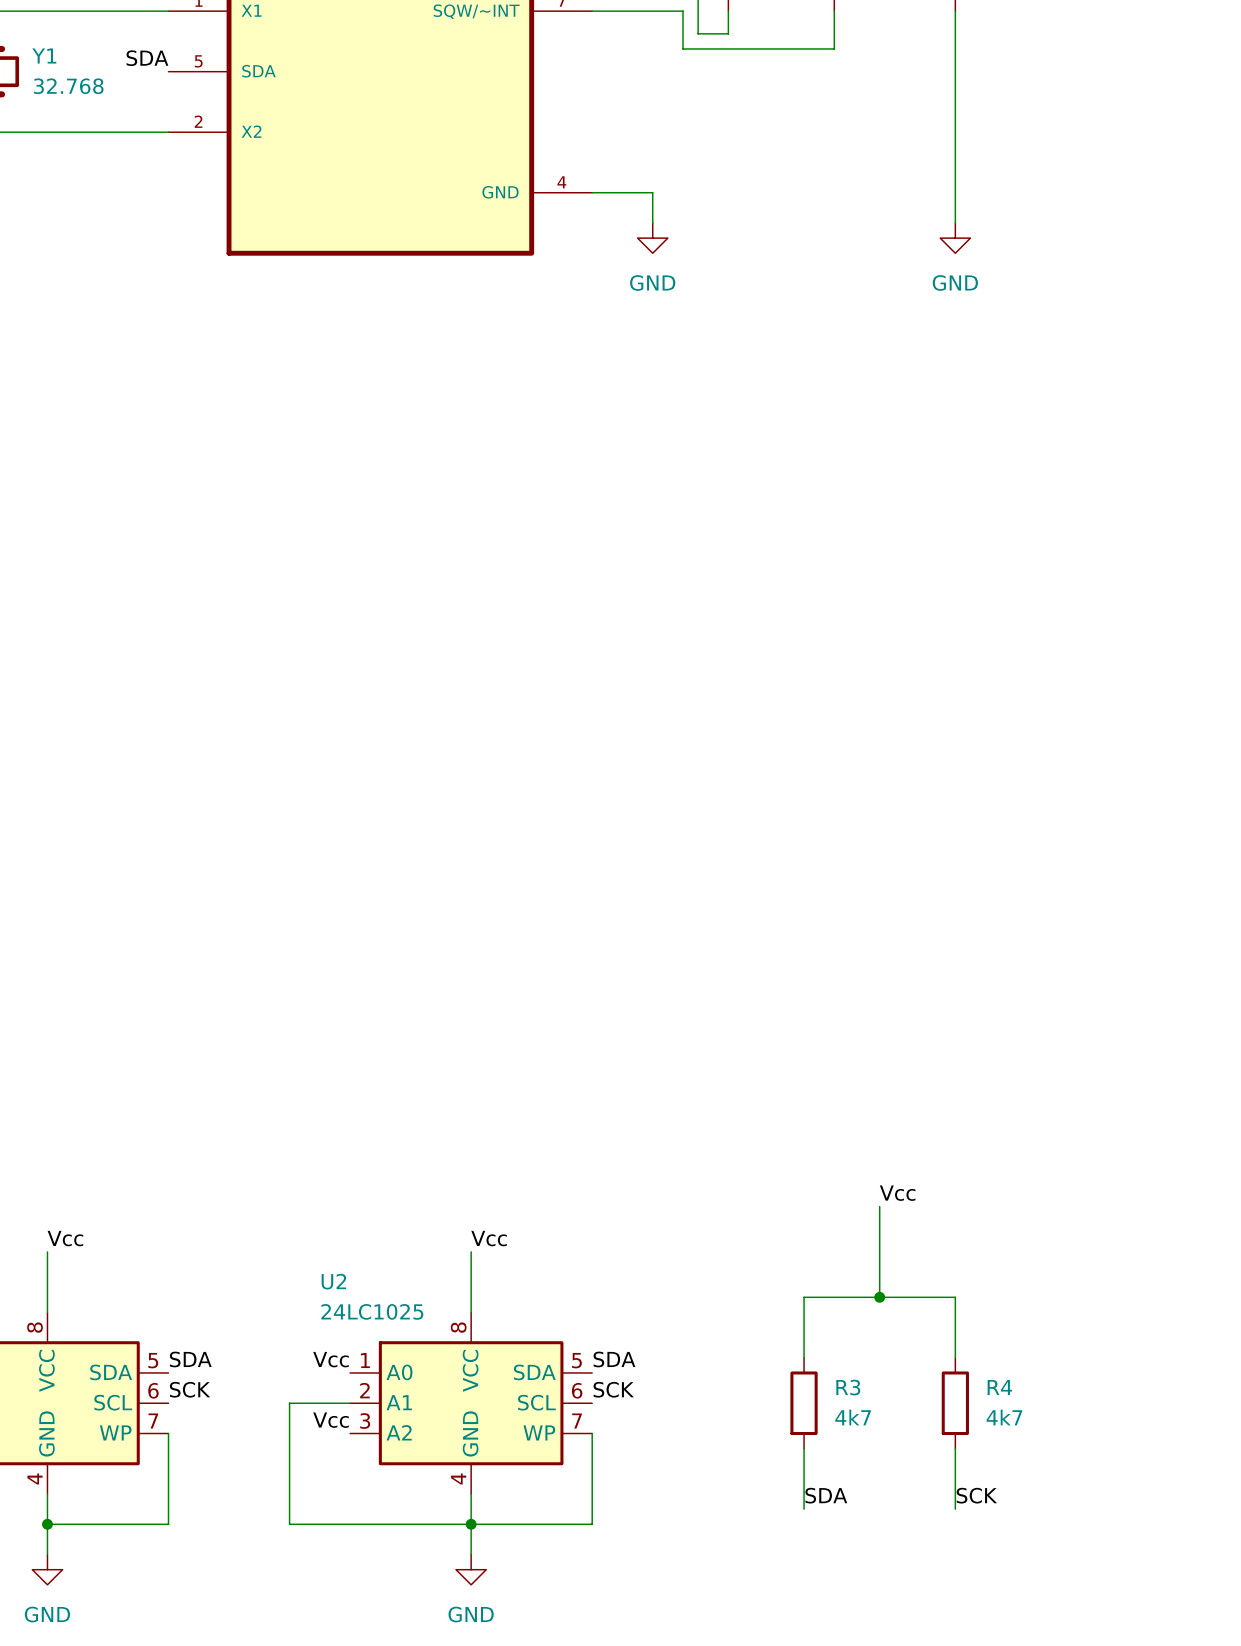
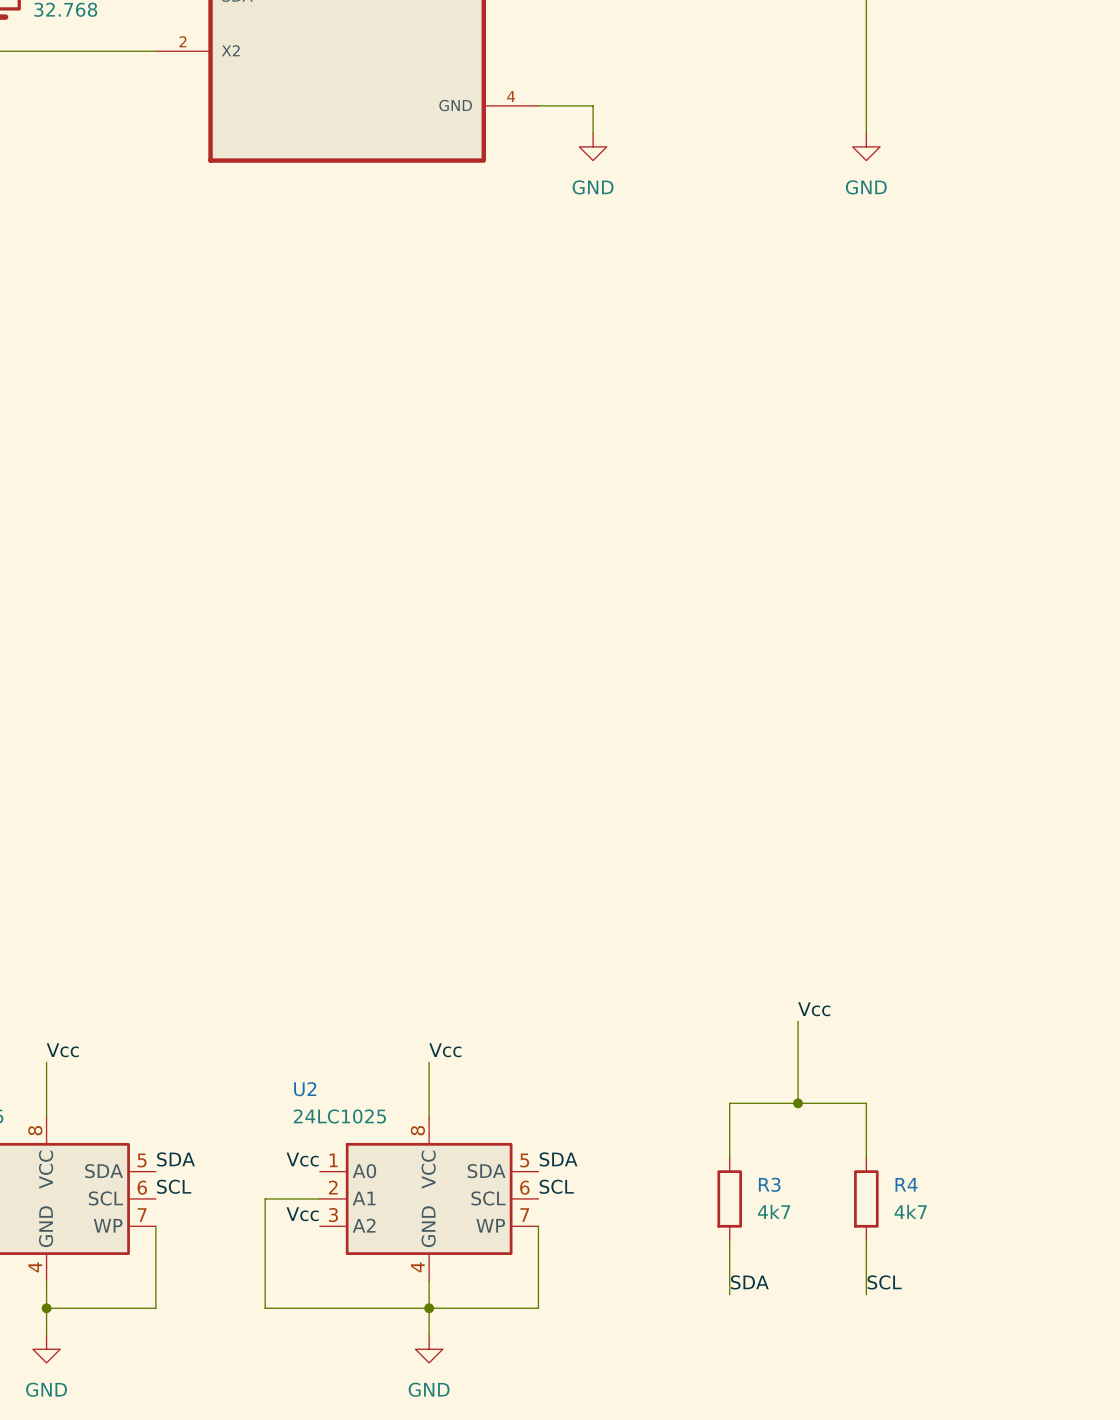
label: SCK (190, 1389) -> SCL (174, 1186)
label: SCK (613, 1389) -> SCL (556, 1186)
label: SCK (976, 1495) -> SCL (884, 1282)

